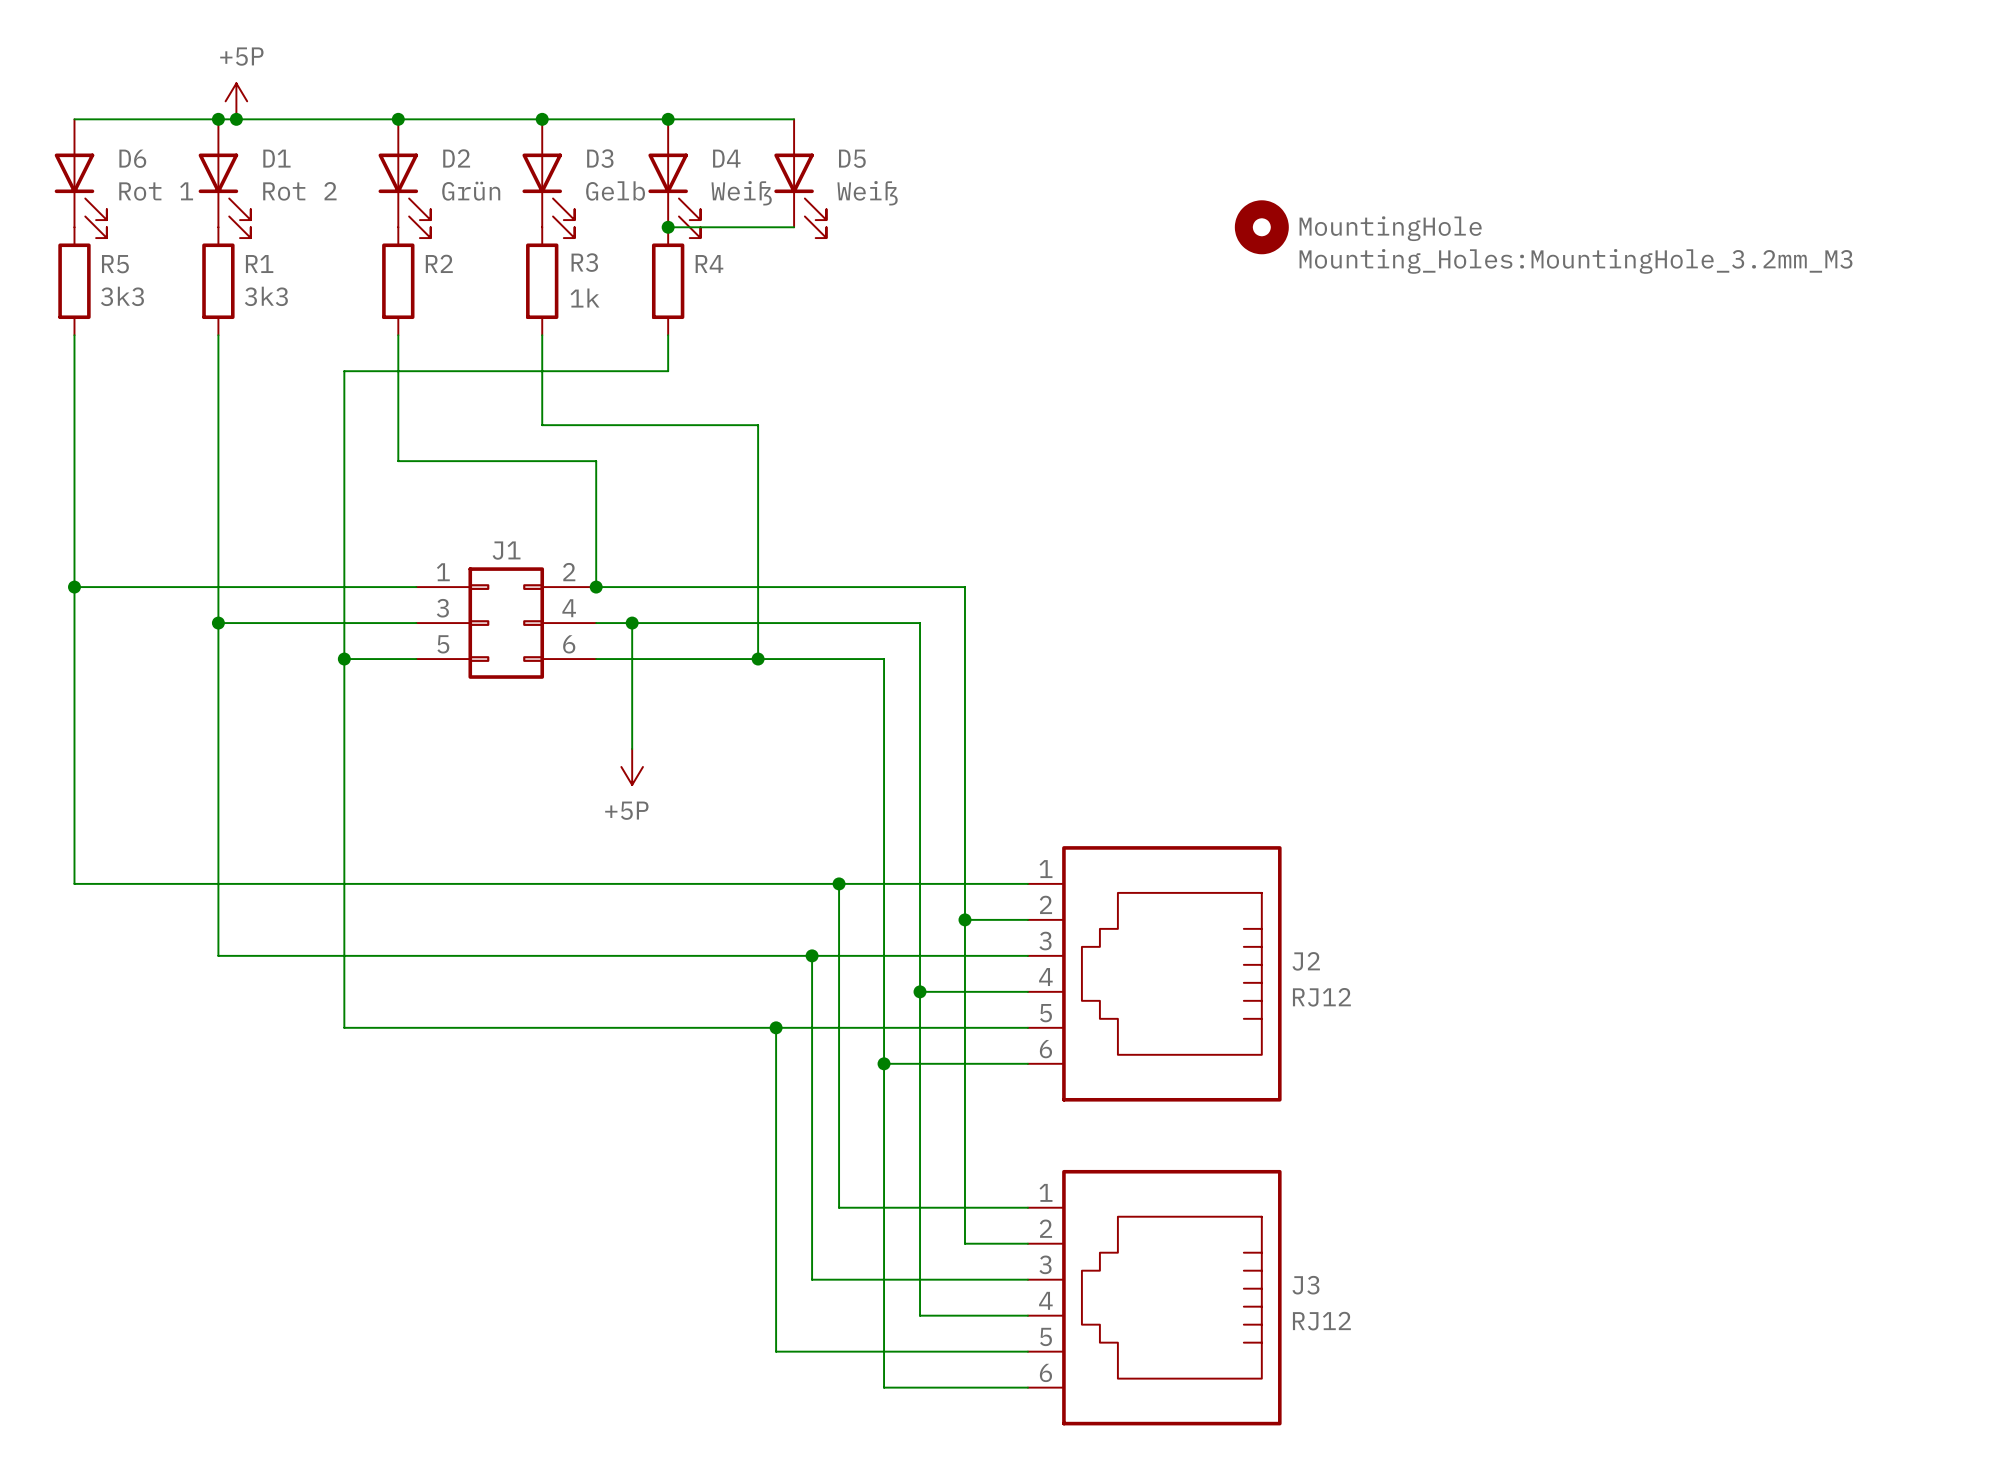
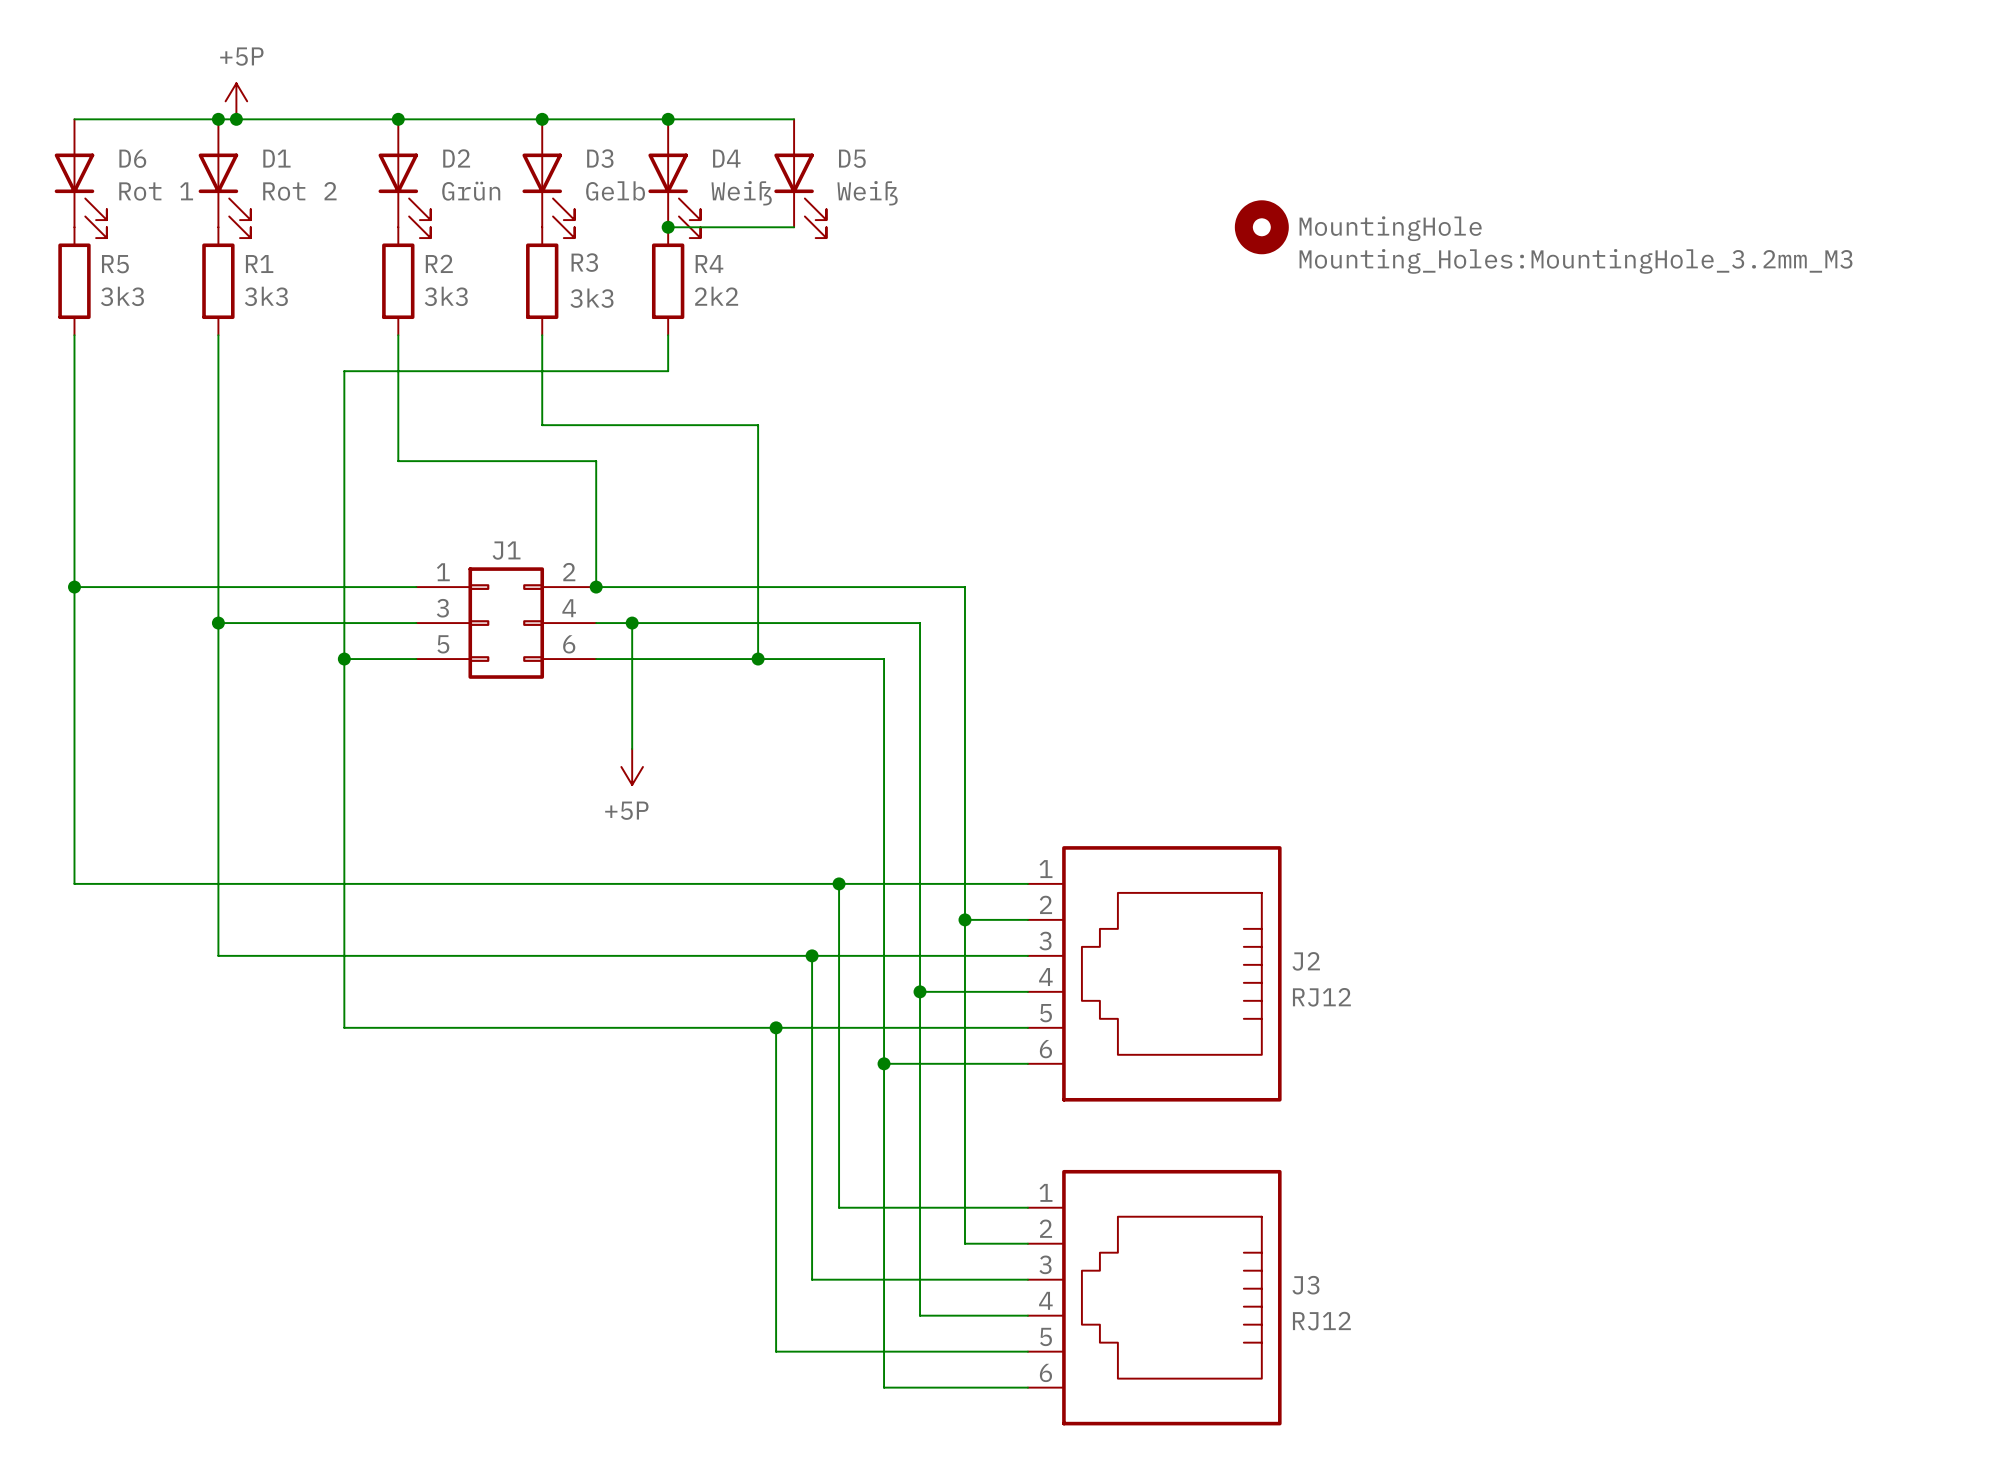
R2 value: none -> 3k3 (446, 296)
R4 value: none -> 2k2 (716, 296)
1k name: 1k (585, 298) -> 3k3 (591, 298)

